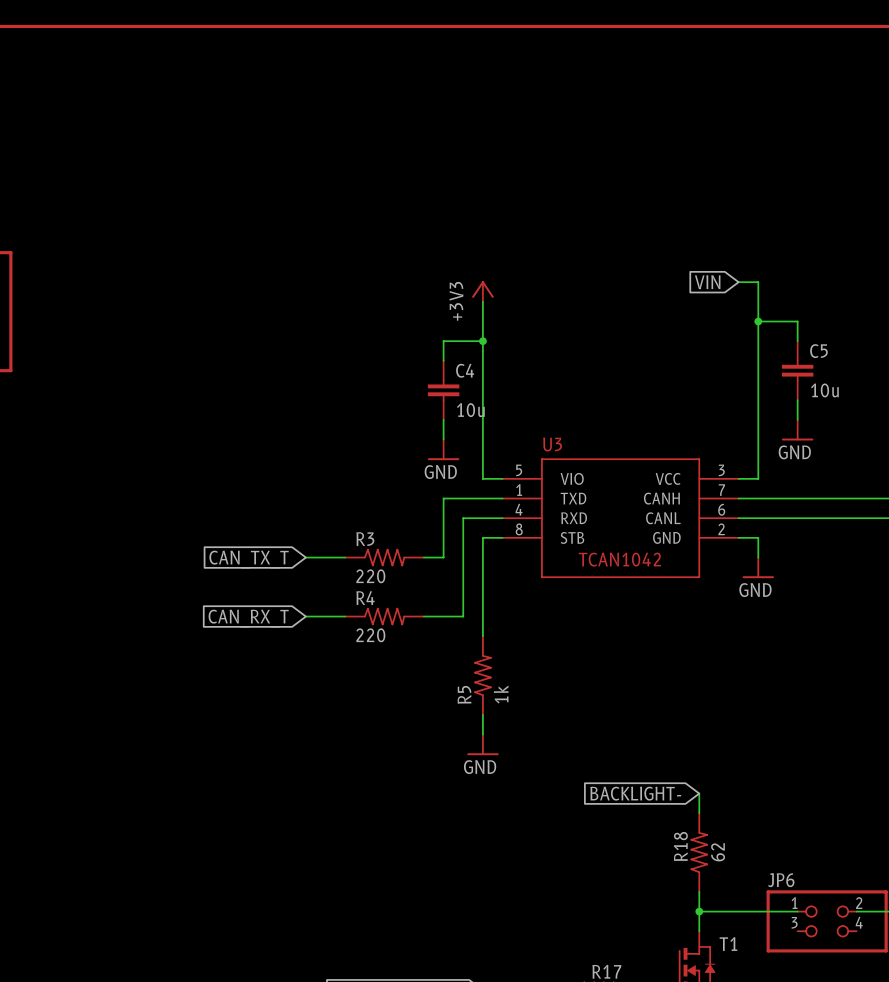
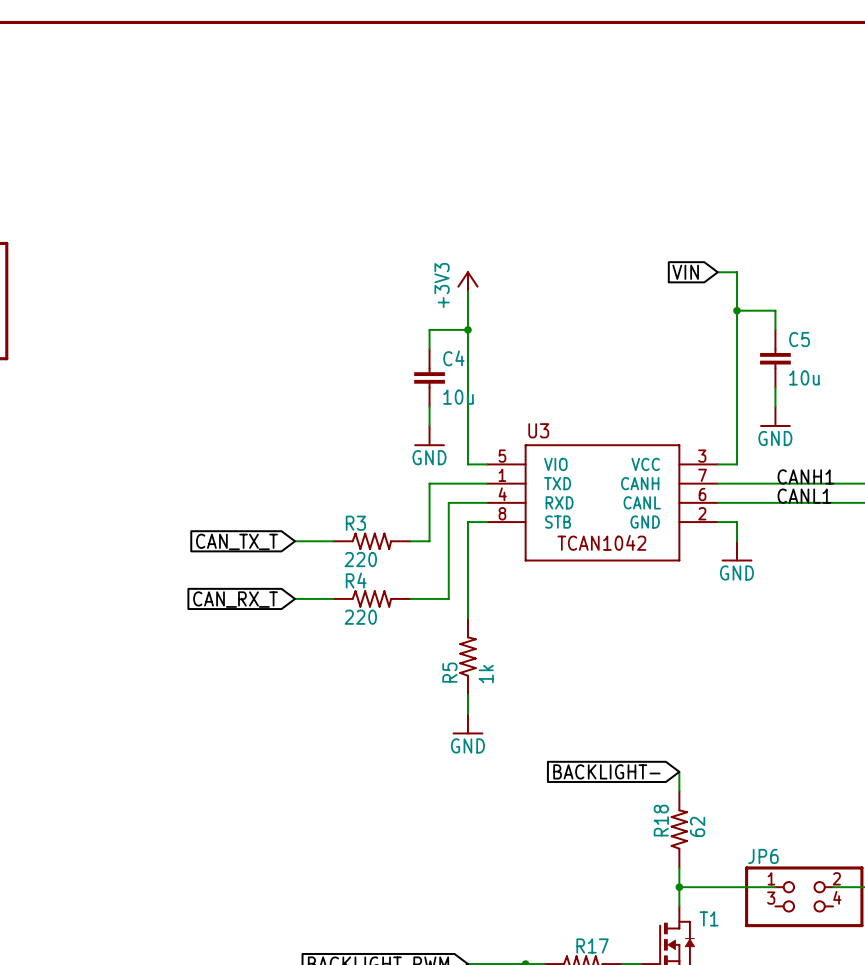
label: none -> CANH1 (805, 476)
label: none -> CANL1 (804, 496)

